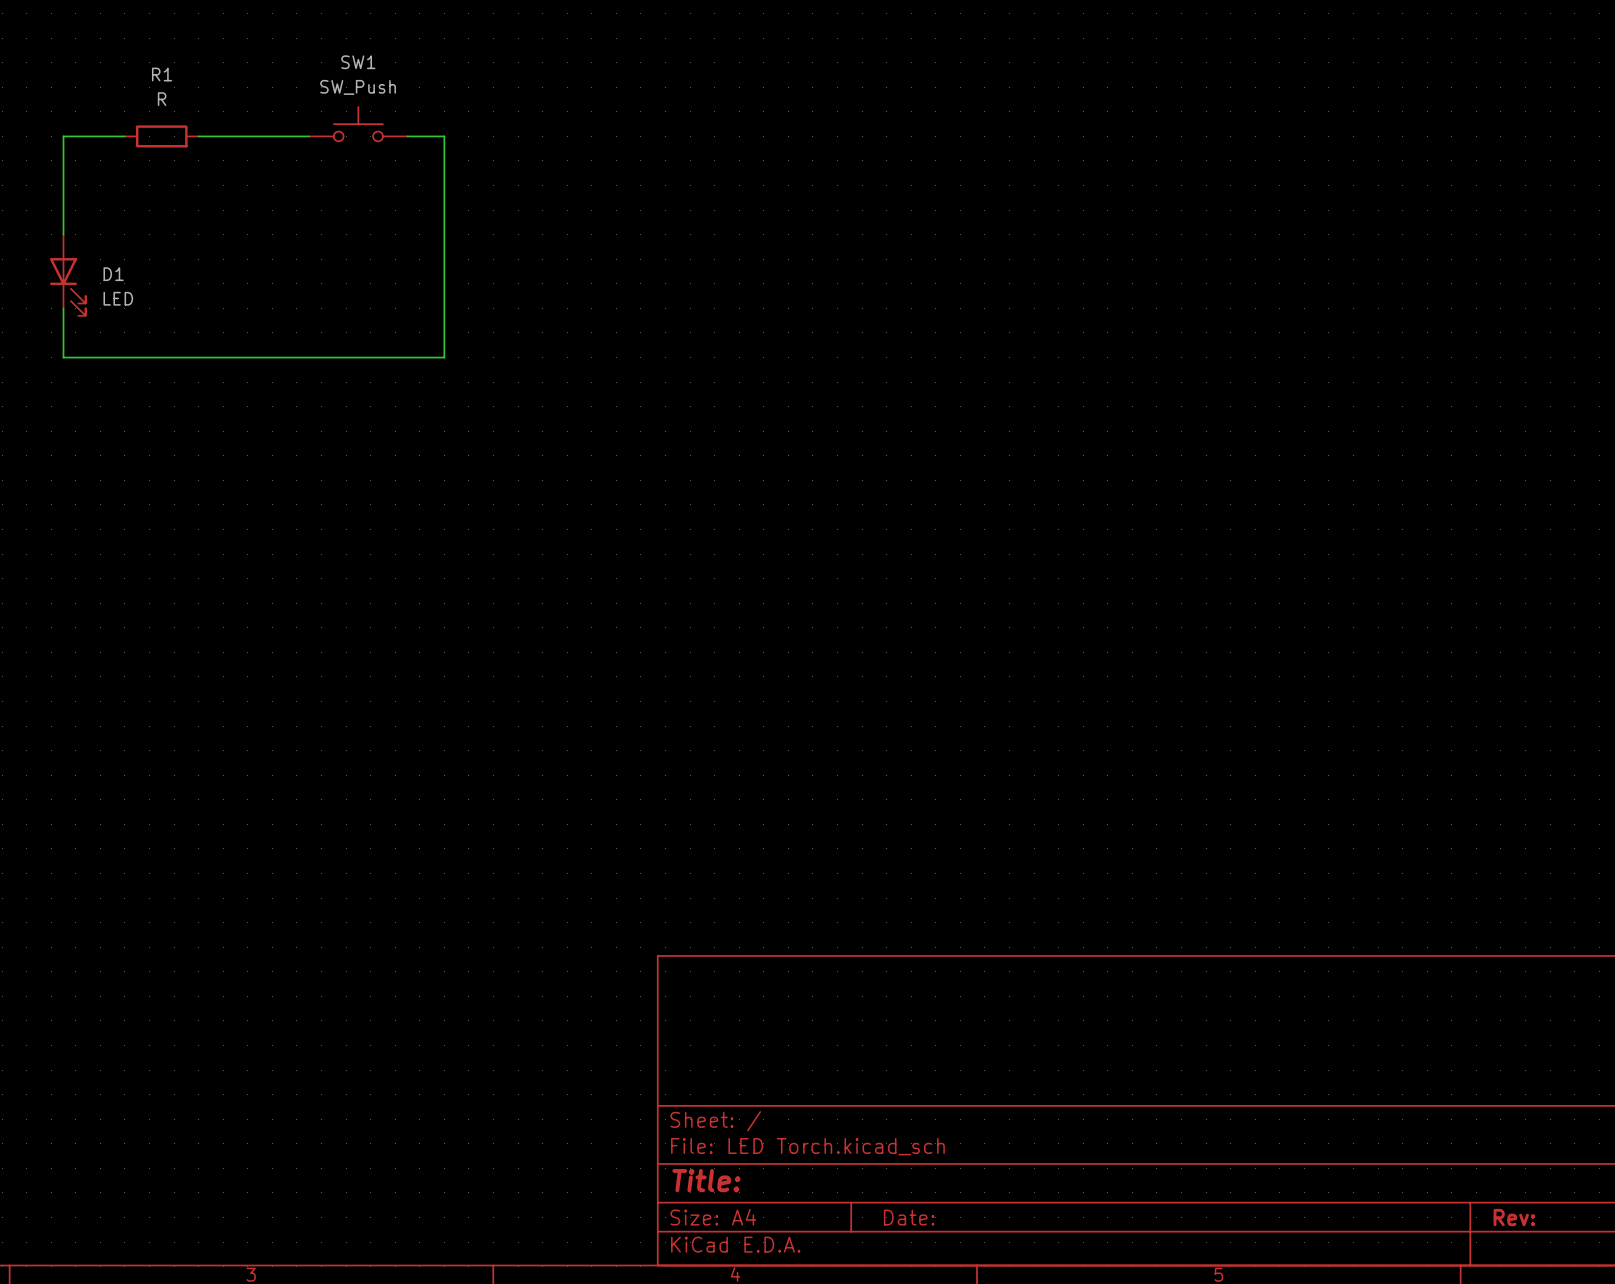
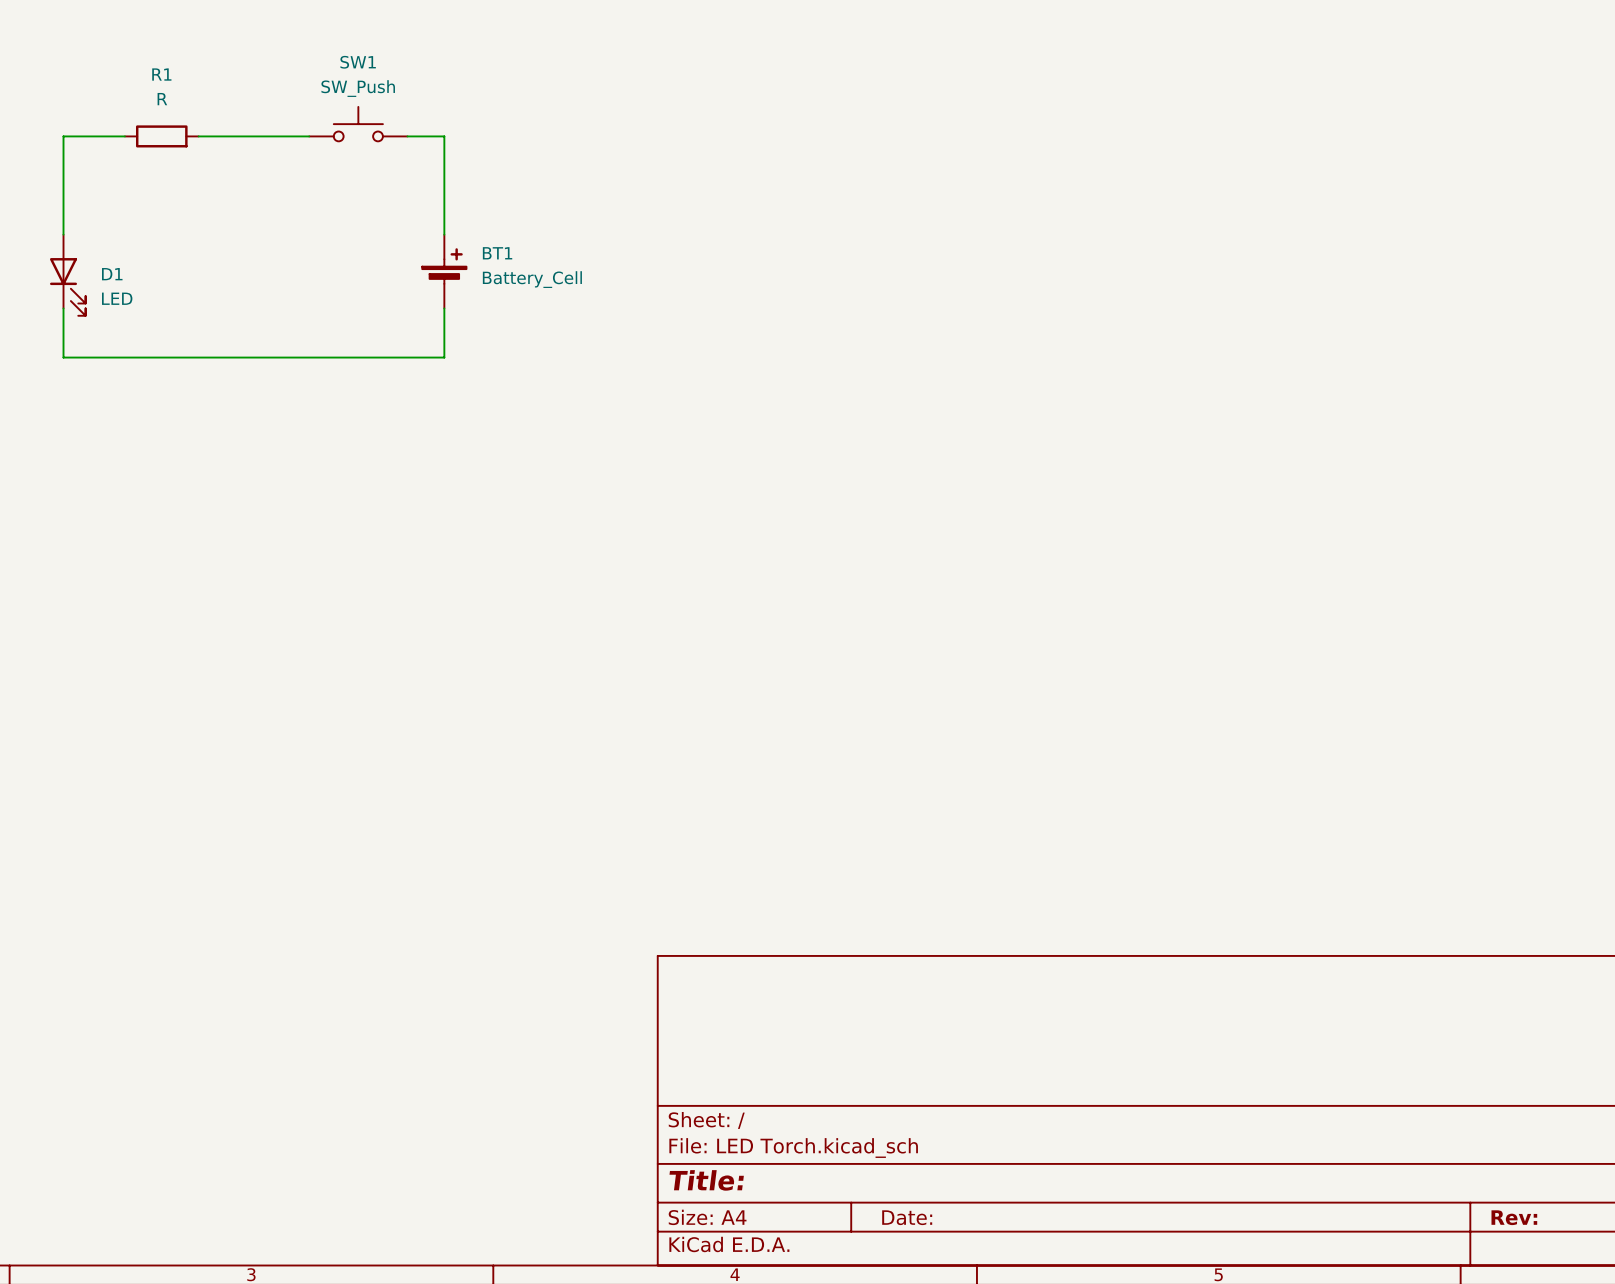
BT1: none -> Battery_Cell (444, 271)

